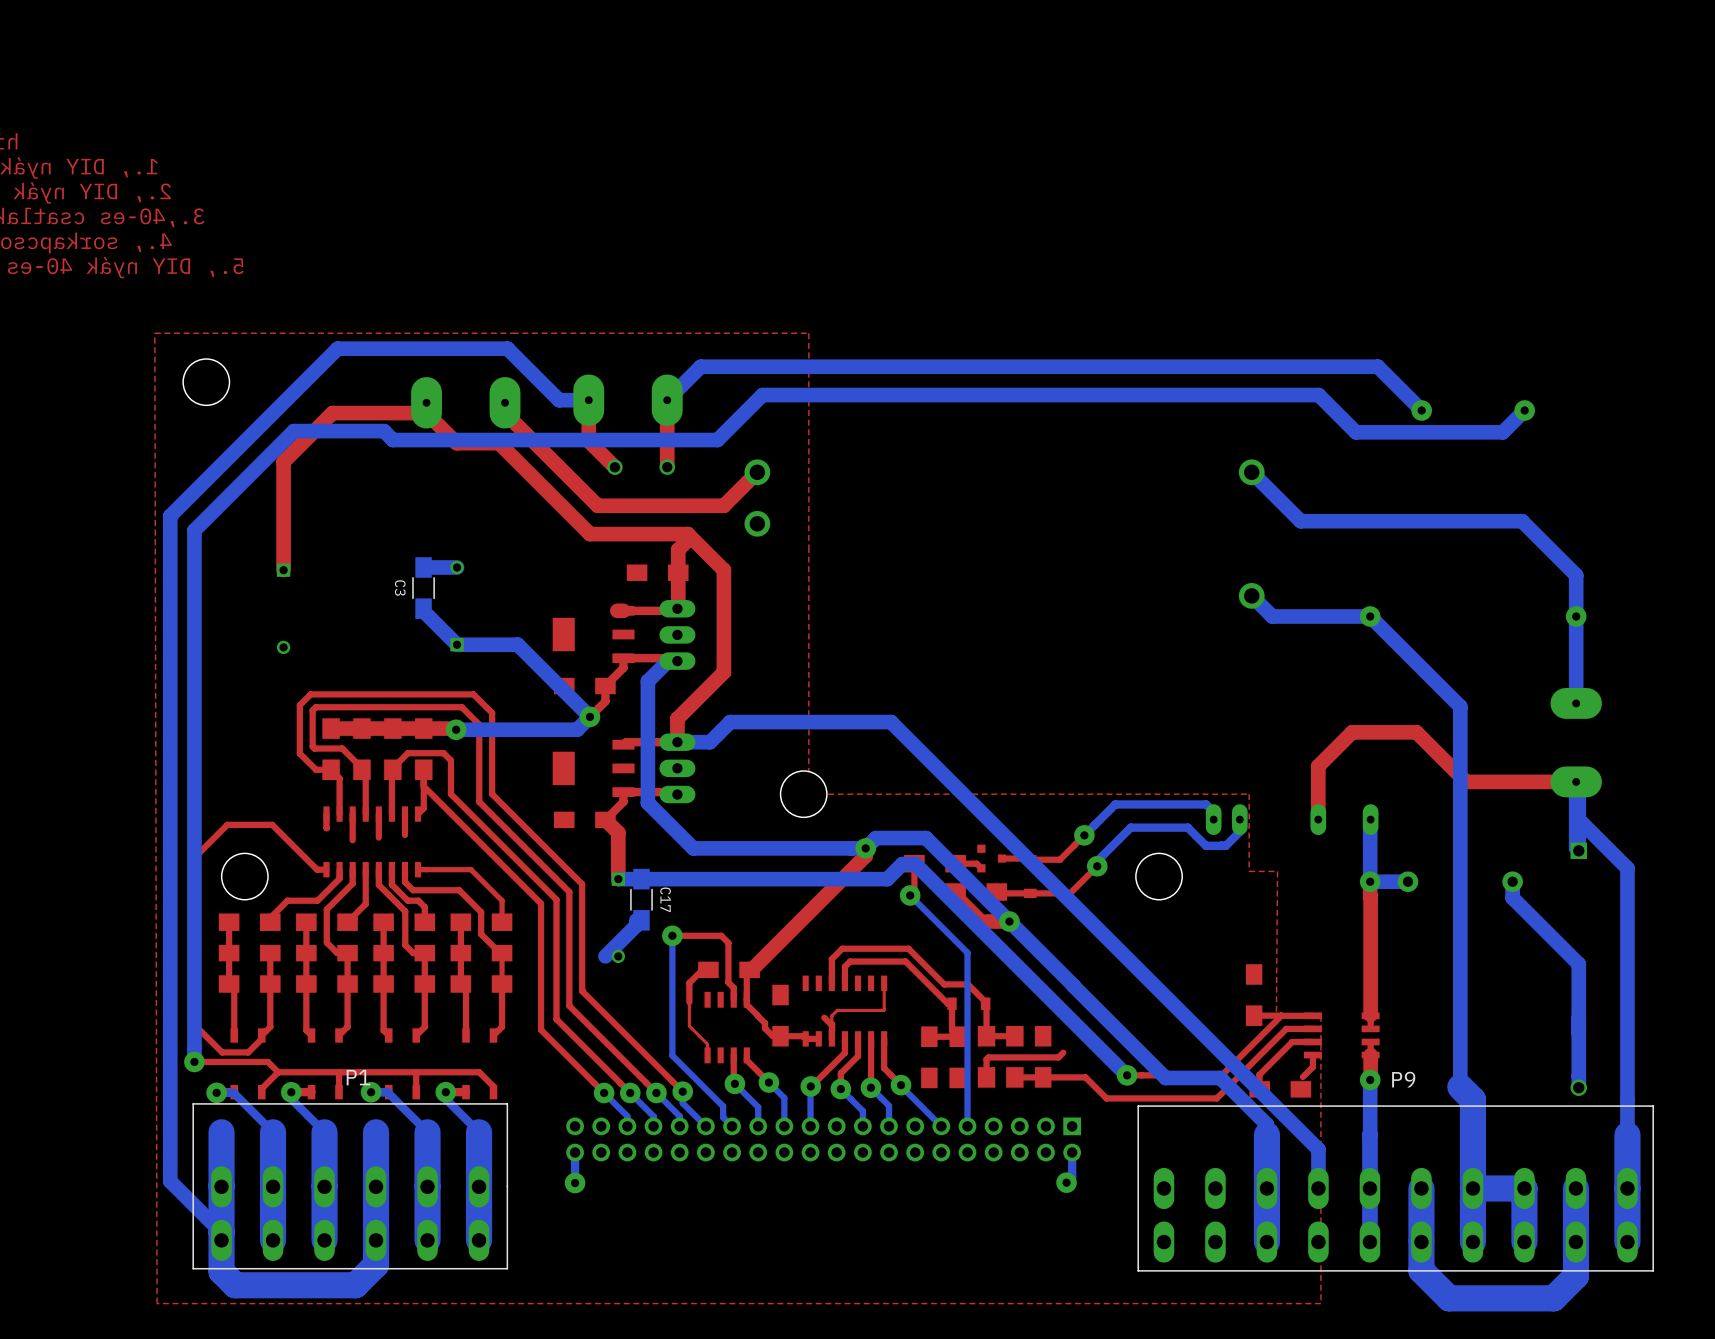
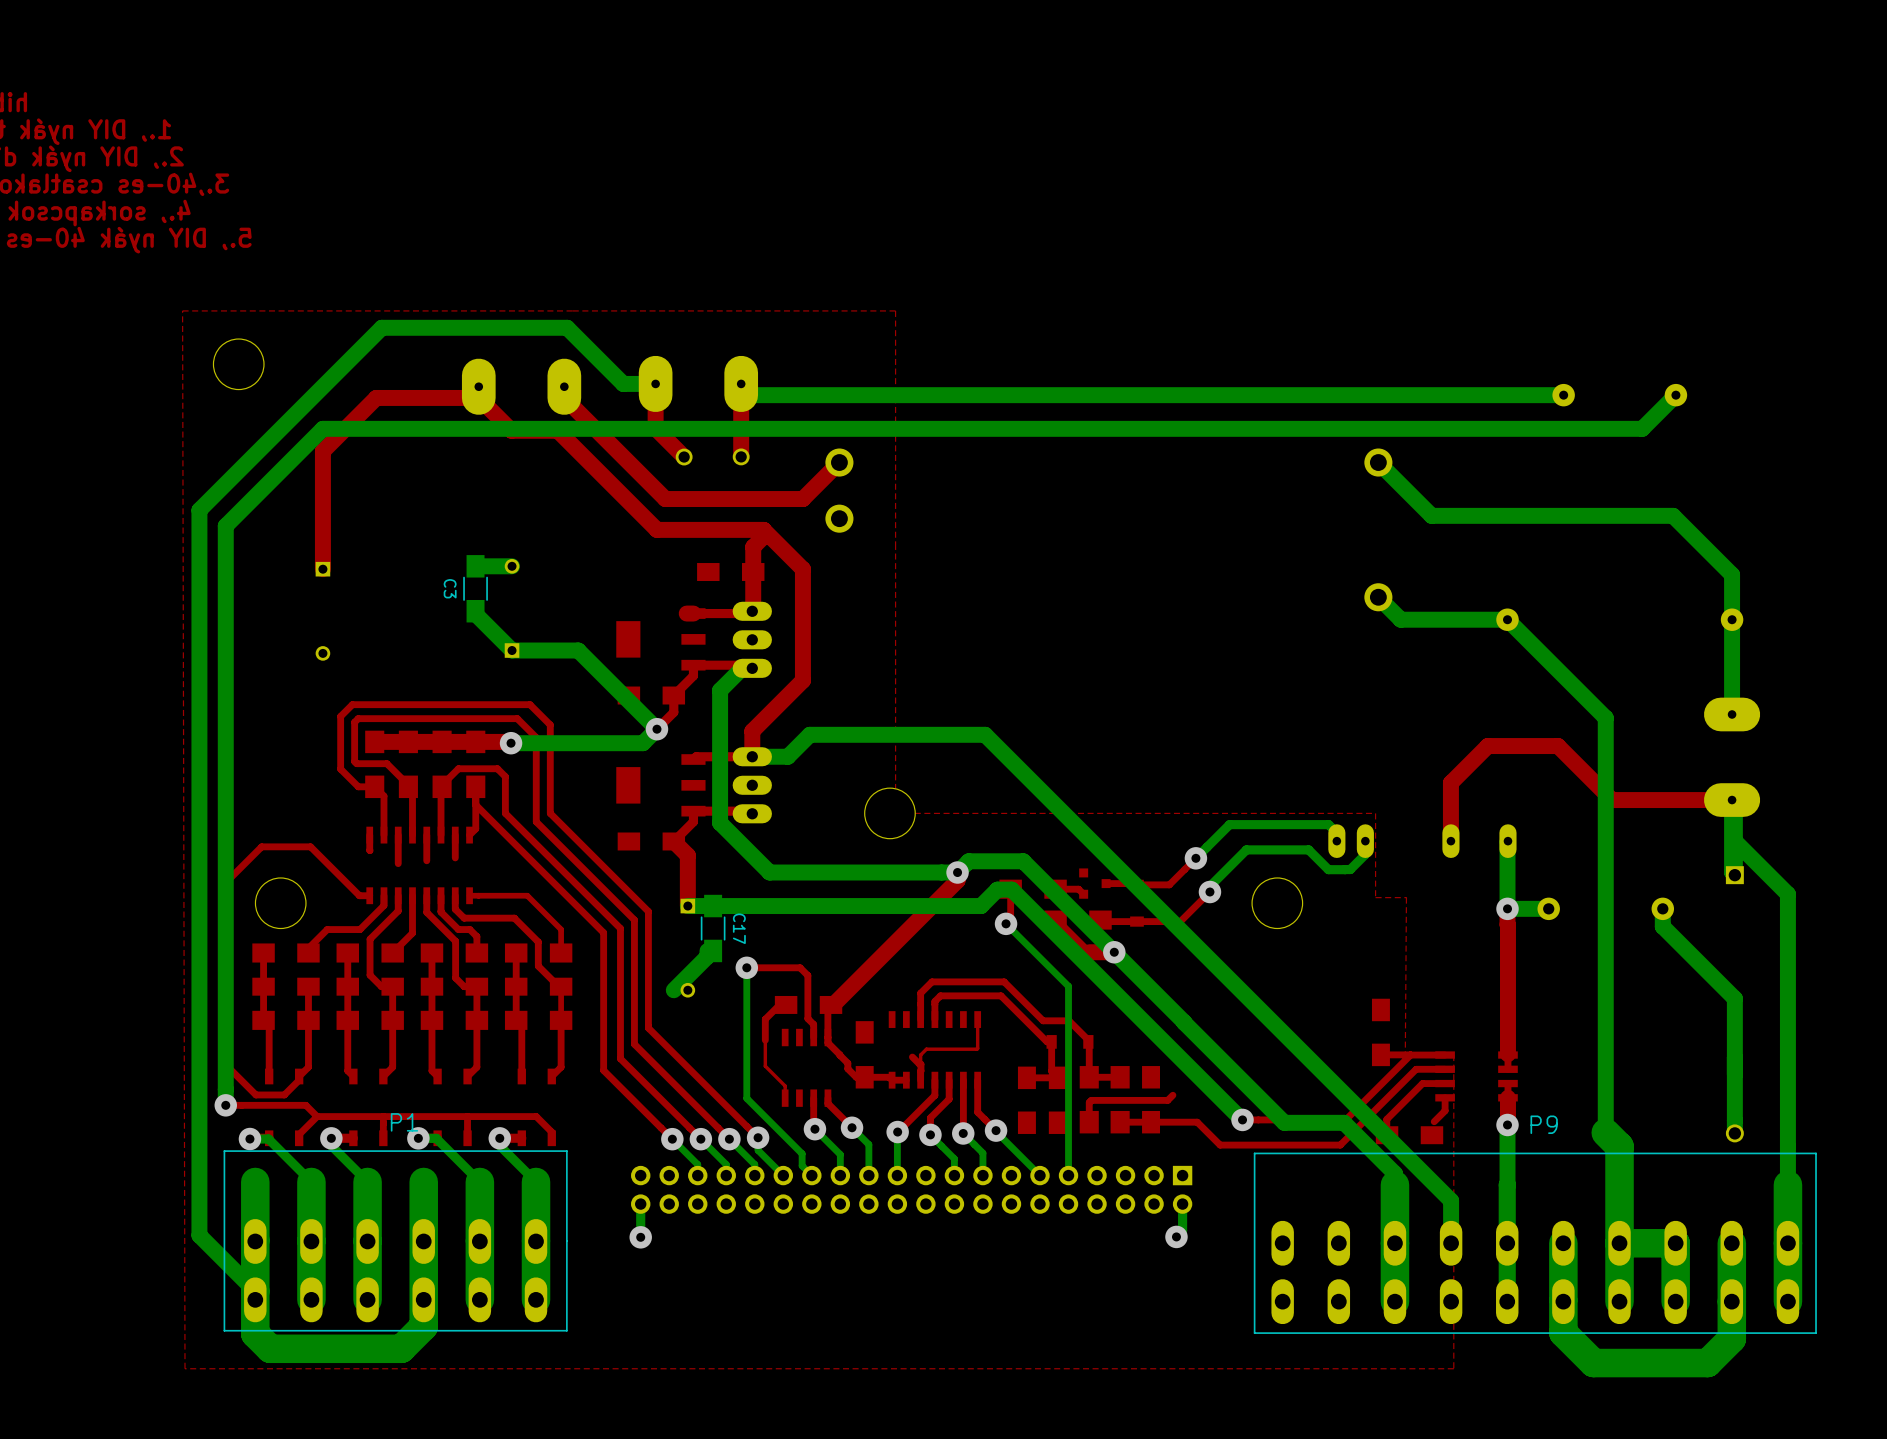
bottom track: (667, 400) (700, 366) (1377, 366) (1421, 410) -> (741, 383) (752, 395) (1563, 395)
bottom track: (1502, 432) (1355, 432) (1318, 395) (762, 395) (717, 440) (392, 440) (384, 431) (293, 431) (283, 441) -> (1652, 418) (1642, 428) (322, 428)

